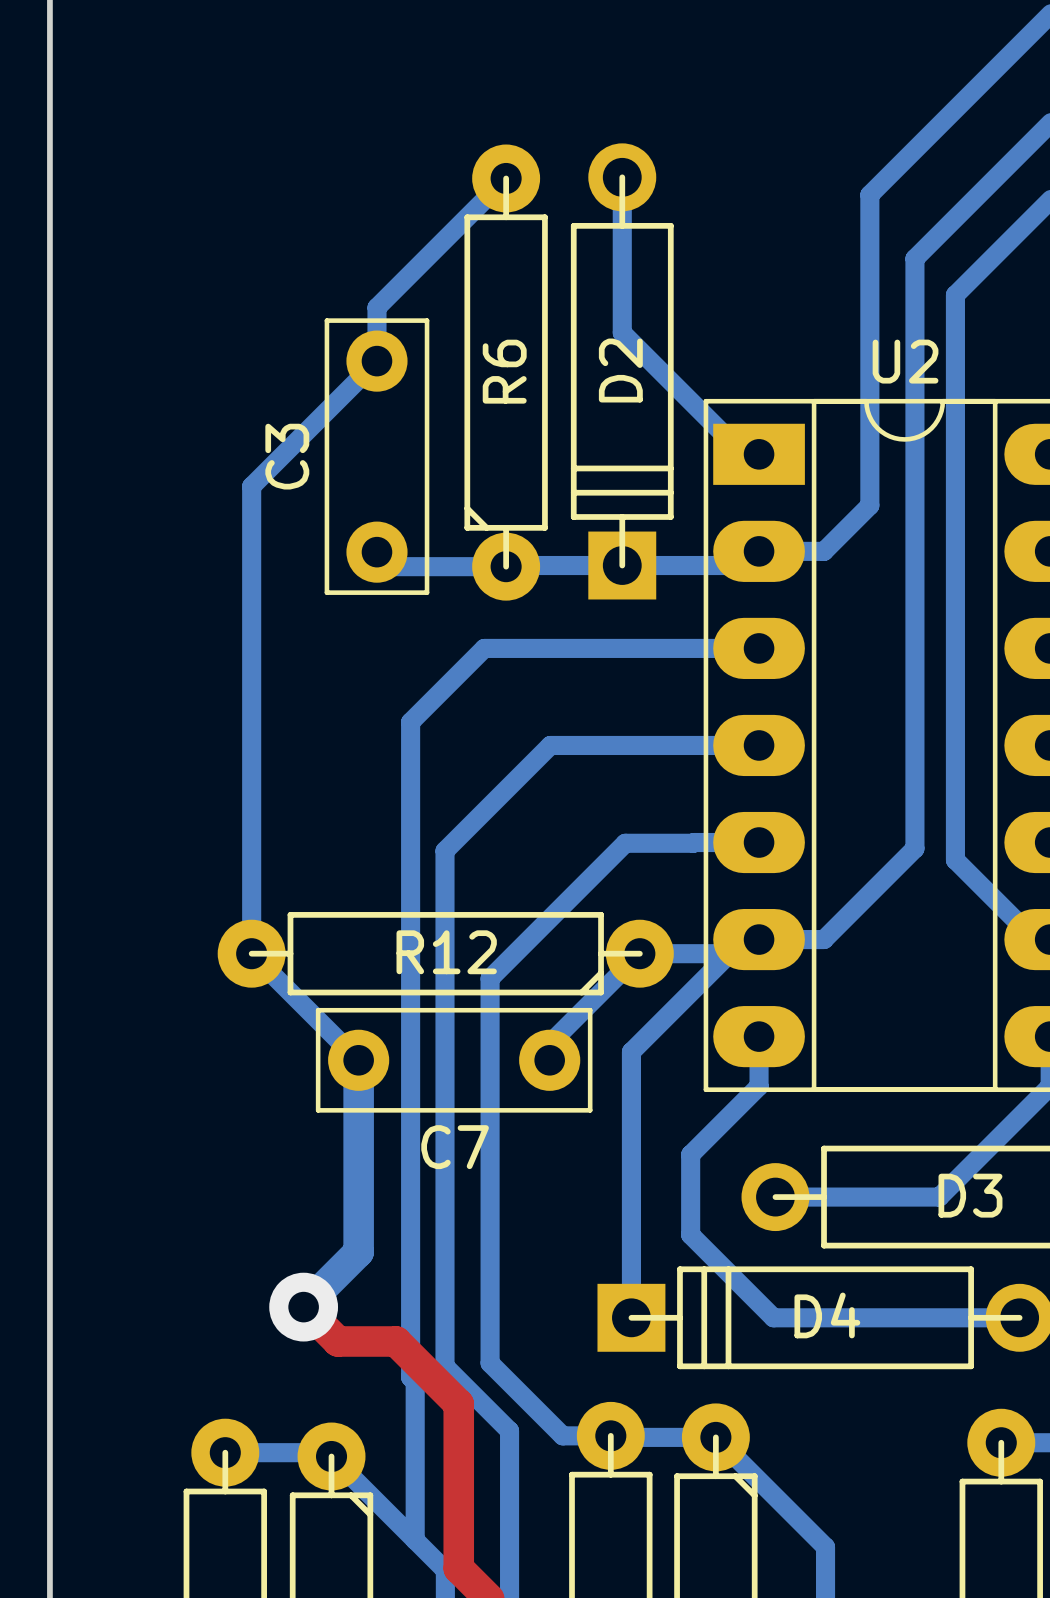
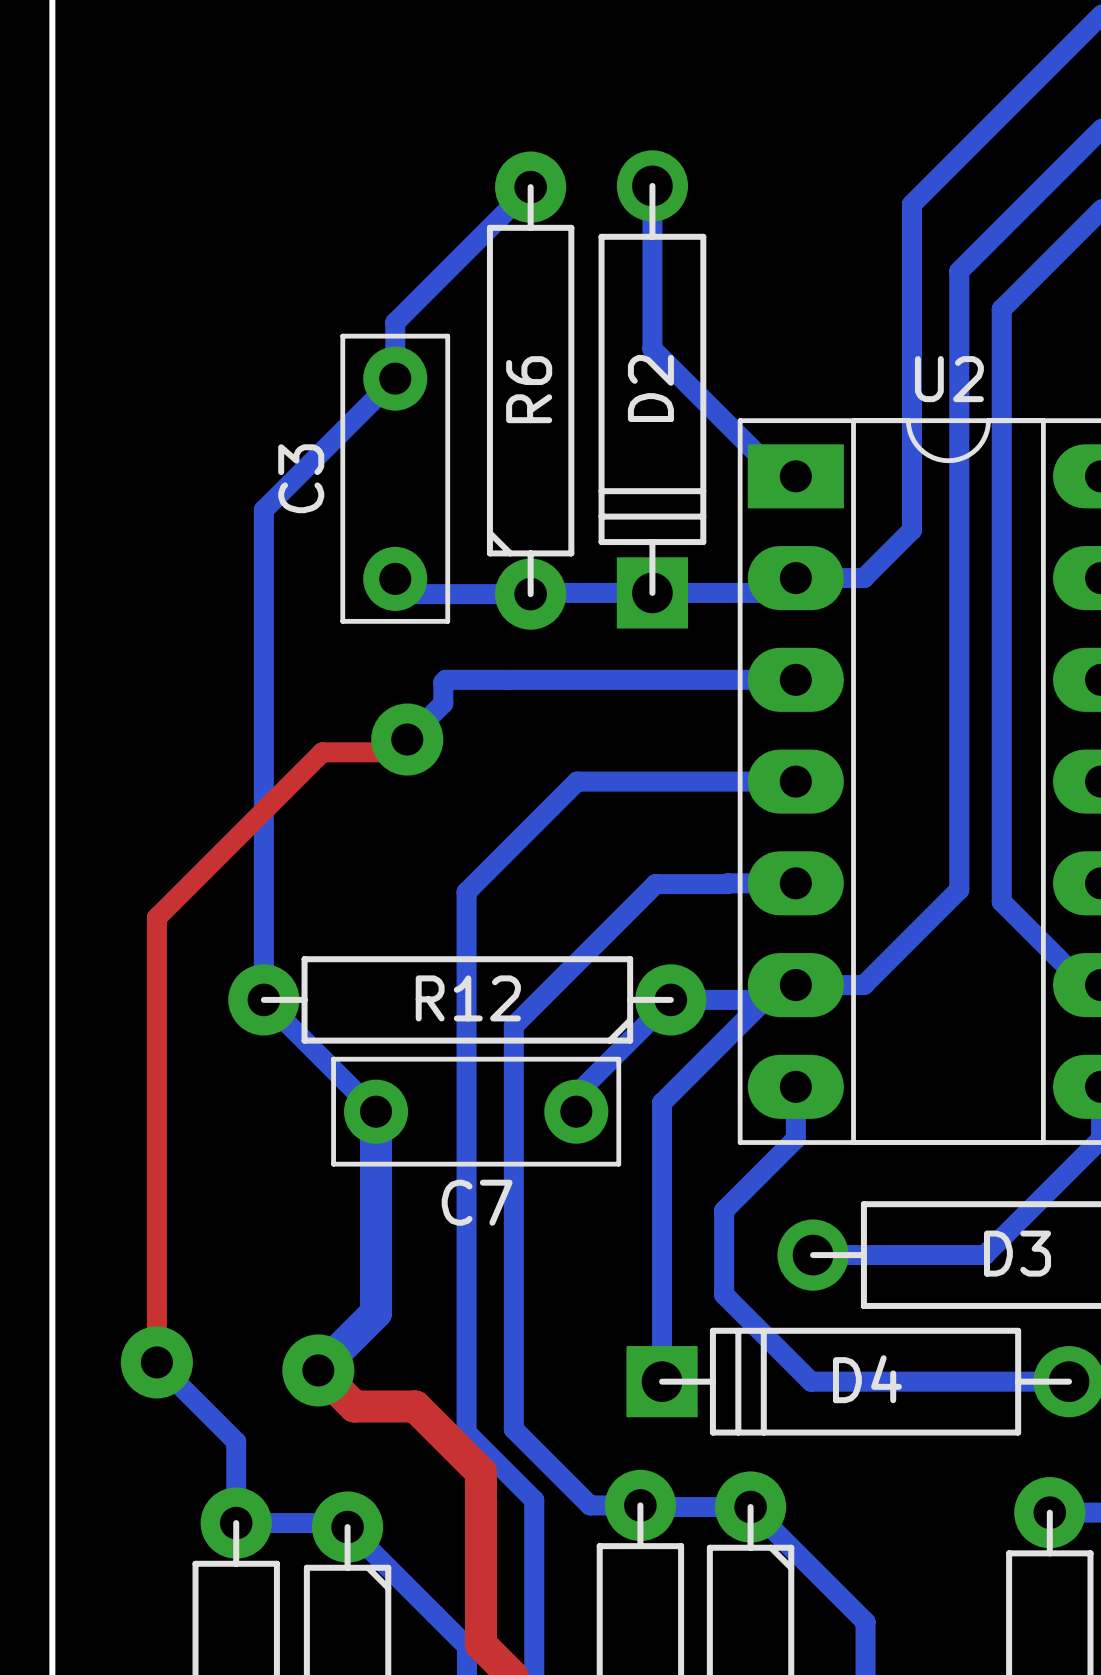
bottom track: (484, 648) (410, 722) (410, 1377) (415, 1381) (415, 1540) -> (507, 679) (445, 679) (443, 682) (443, 703) (407, 739)
top track: none -> (407, 739) (394, 752) (322, 752) (156, 917) (156, 1362)
via: none -> (407, 739)
bottom track: none -> (156, 1362) (236, 1441) (236, 1523)
via: none -> (156, 1362)

